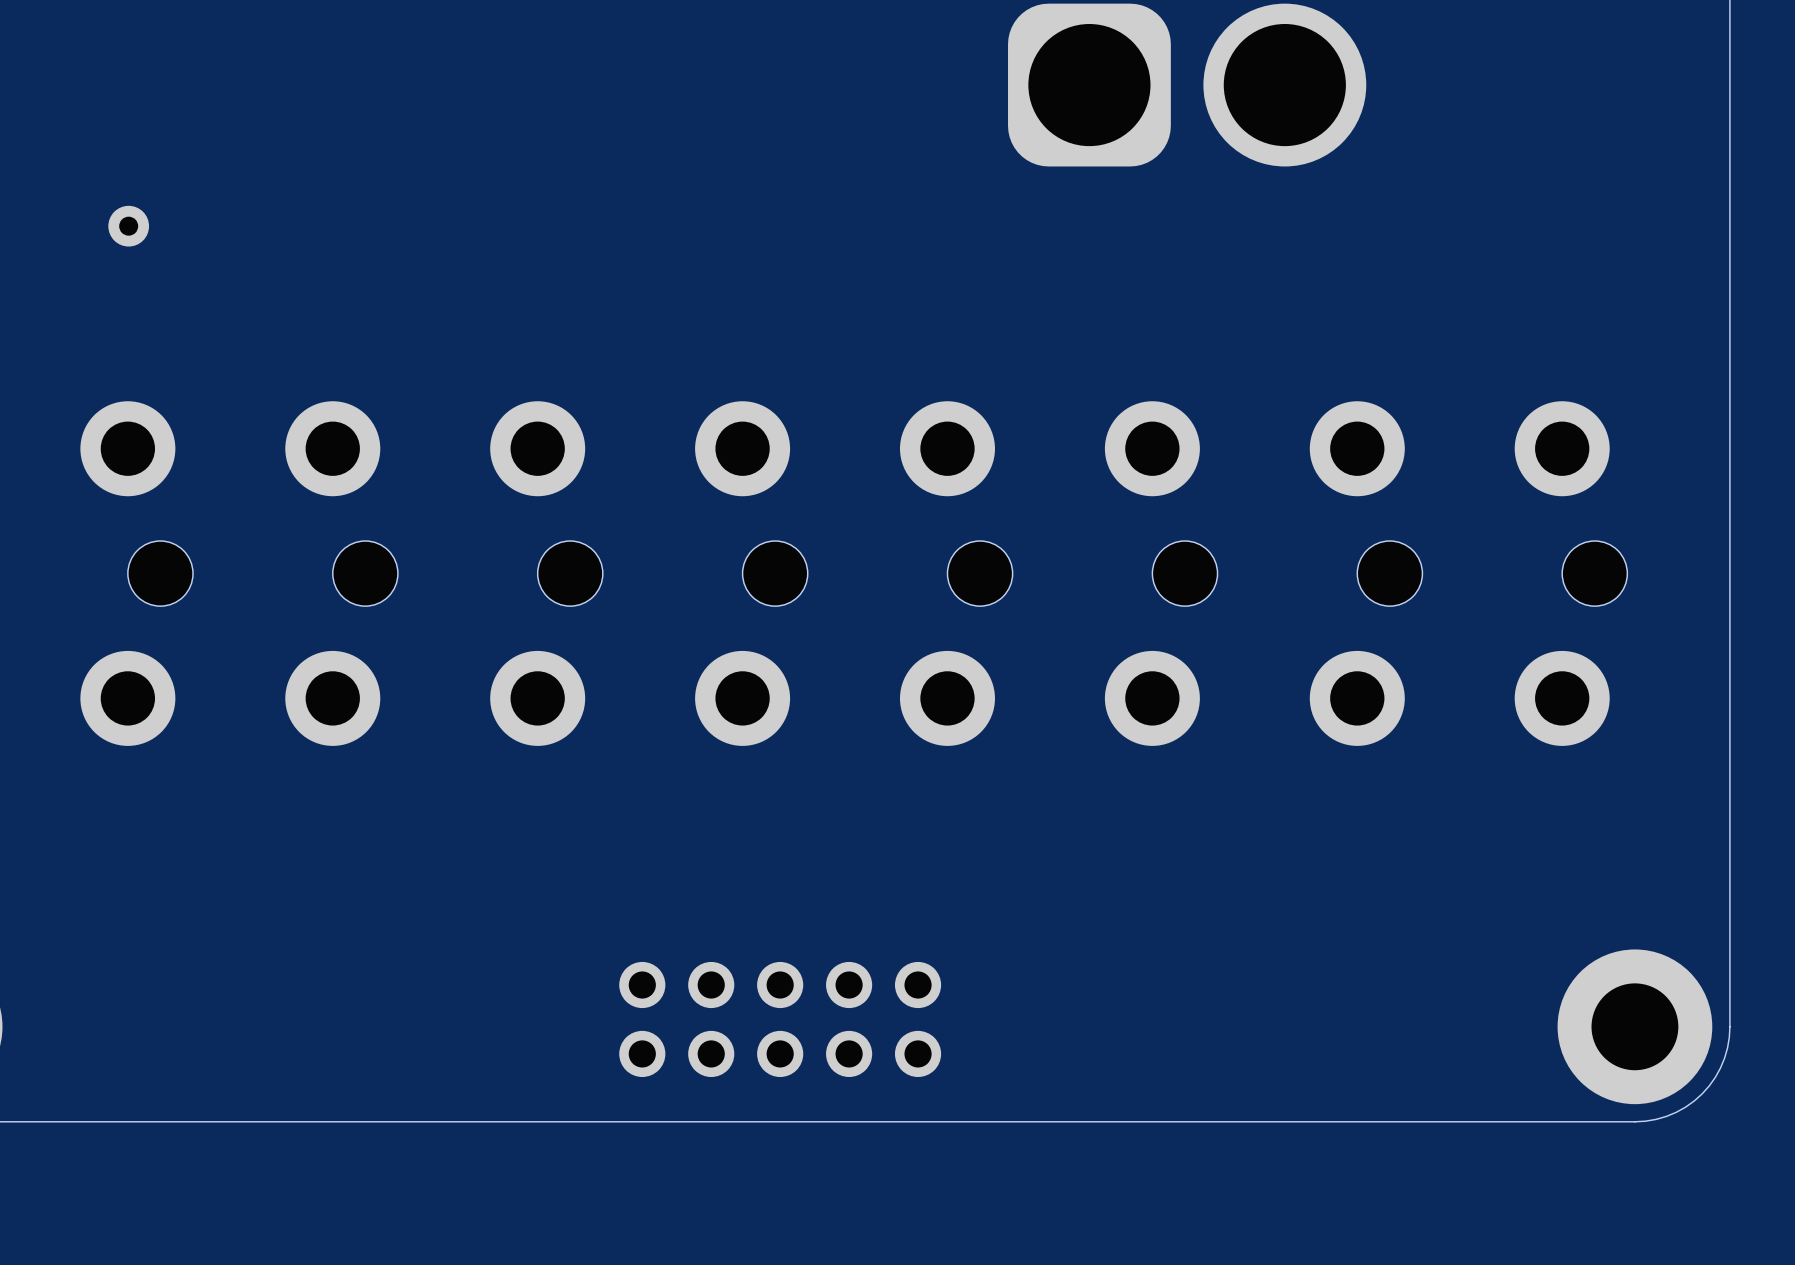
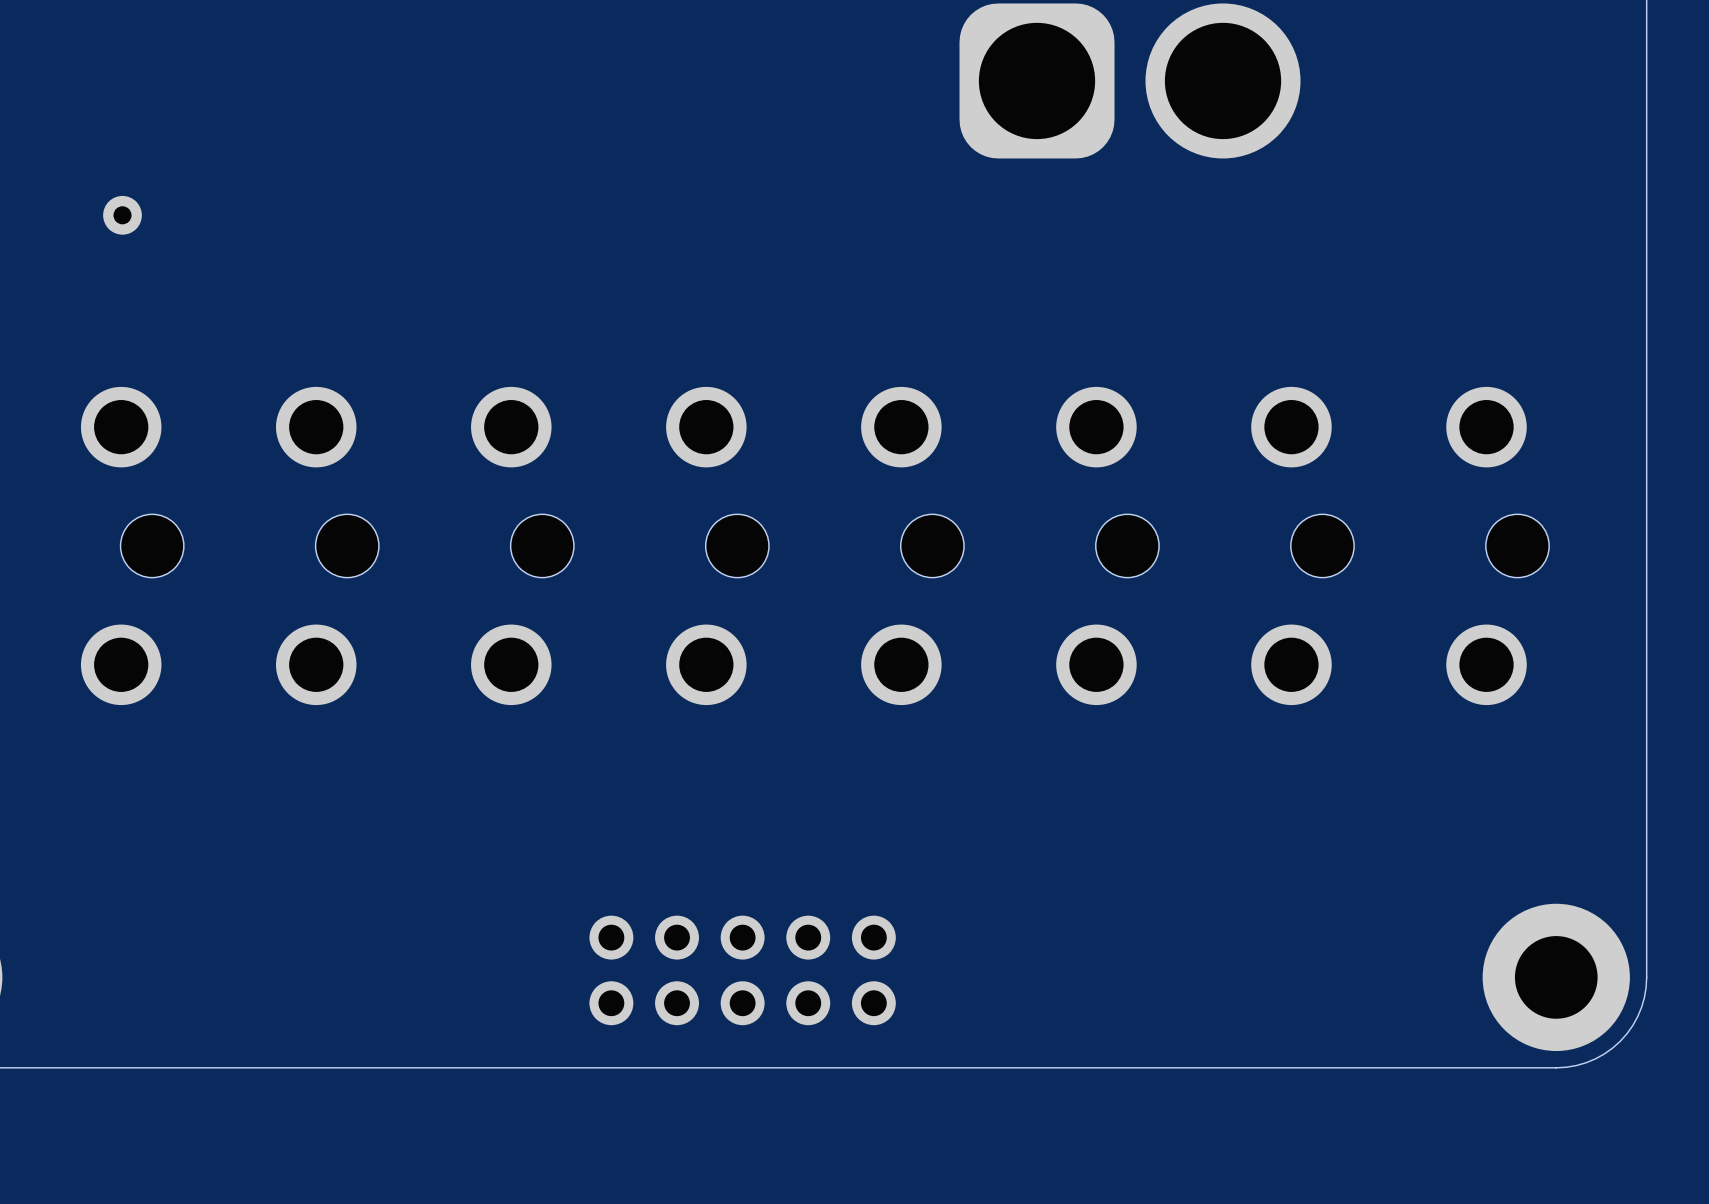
part footprint: [80, 401, 194, 746] -> [80, 386, 184, 706]
part footprint: [285, 401, 398, 746] -> [276, 386, 379, 706]
part footprint: [490, 401, 603, 746] -> [471, 386, 574, 706]
part footprint: [695, 401, 808, 746] -> [666, 386, 769, 706]
part footprint: [899, 401, 1013, 746] -> [861, 386, 965, 706]
part footprint: [1104, 401, 1218, 746] -> [1056, 386, 1160, 706]
part footprint: [1309, 401, 1423, 746] -> [1251, 386, 1355, 706]
part footprint: [1514, 401, 1628, 746] -> [1446, 386, 1550, 706]

